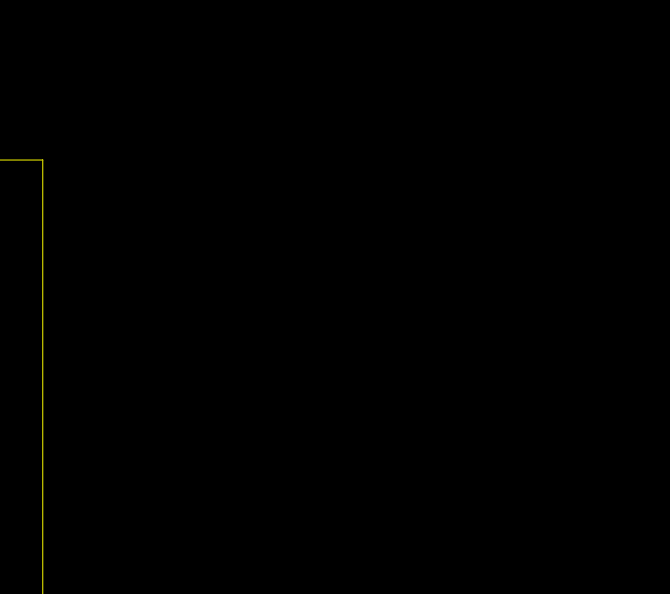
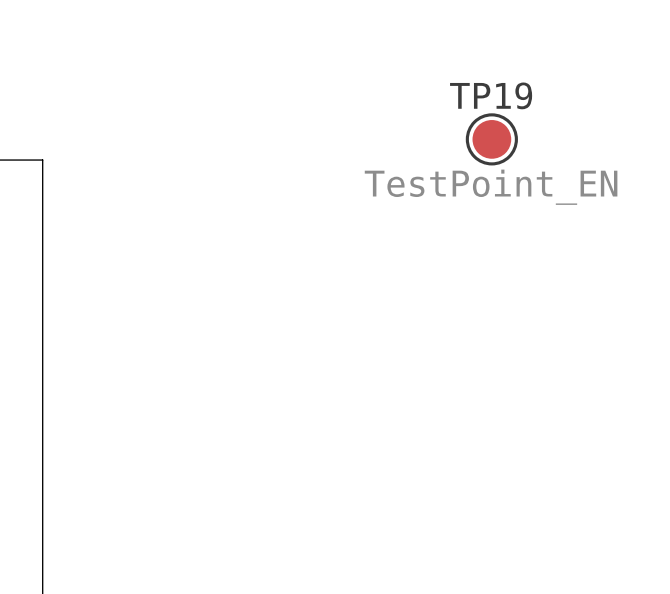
TP19: none -> TestPoint_EN (491, 139)

